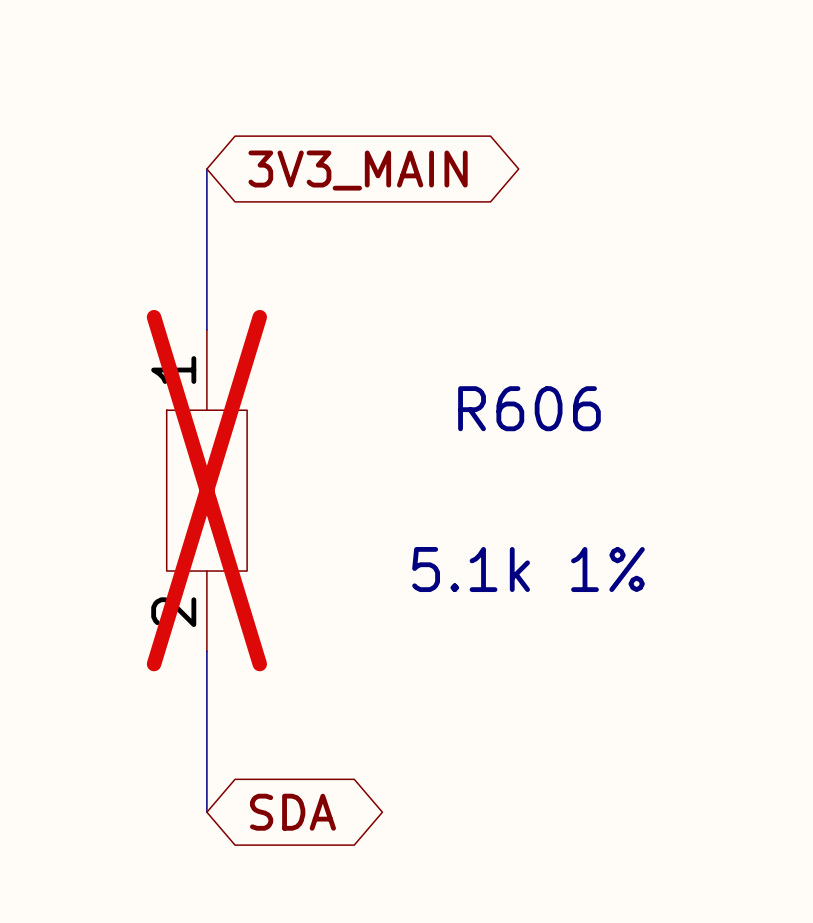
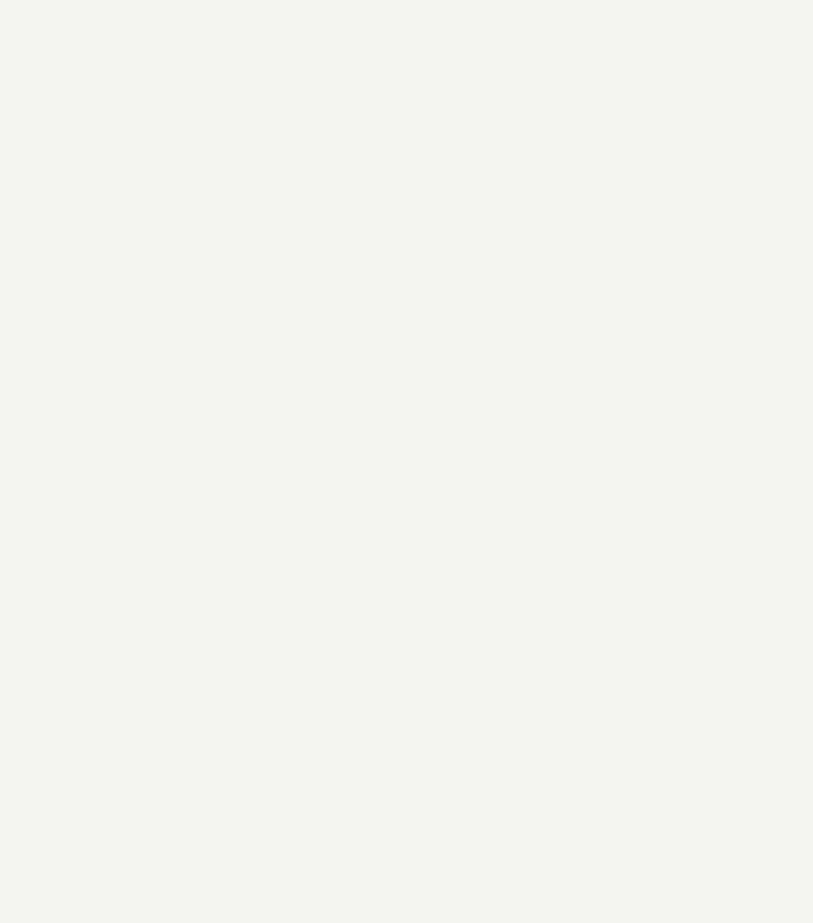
wire: (206, 169) (206, 329) -> none
global label: 3V3_MAIN (358, 170) -> none
R606: 5.1k 1% (206, 490) -> none
wire: (206, 651) (206, 812) -> none
global label: SDA (292, 812) -> none

